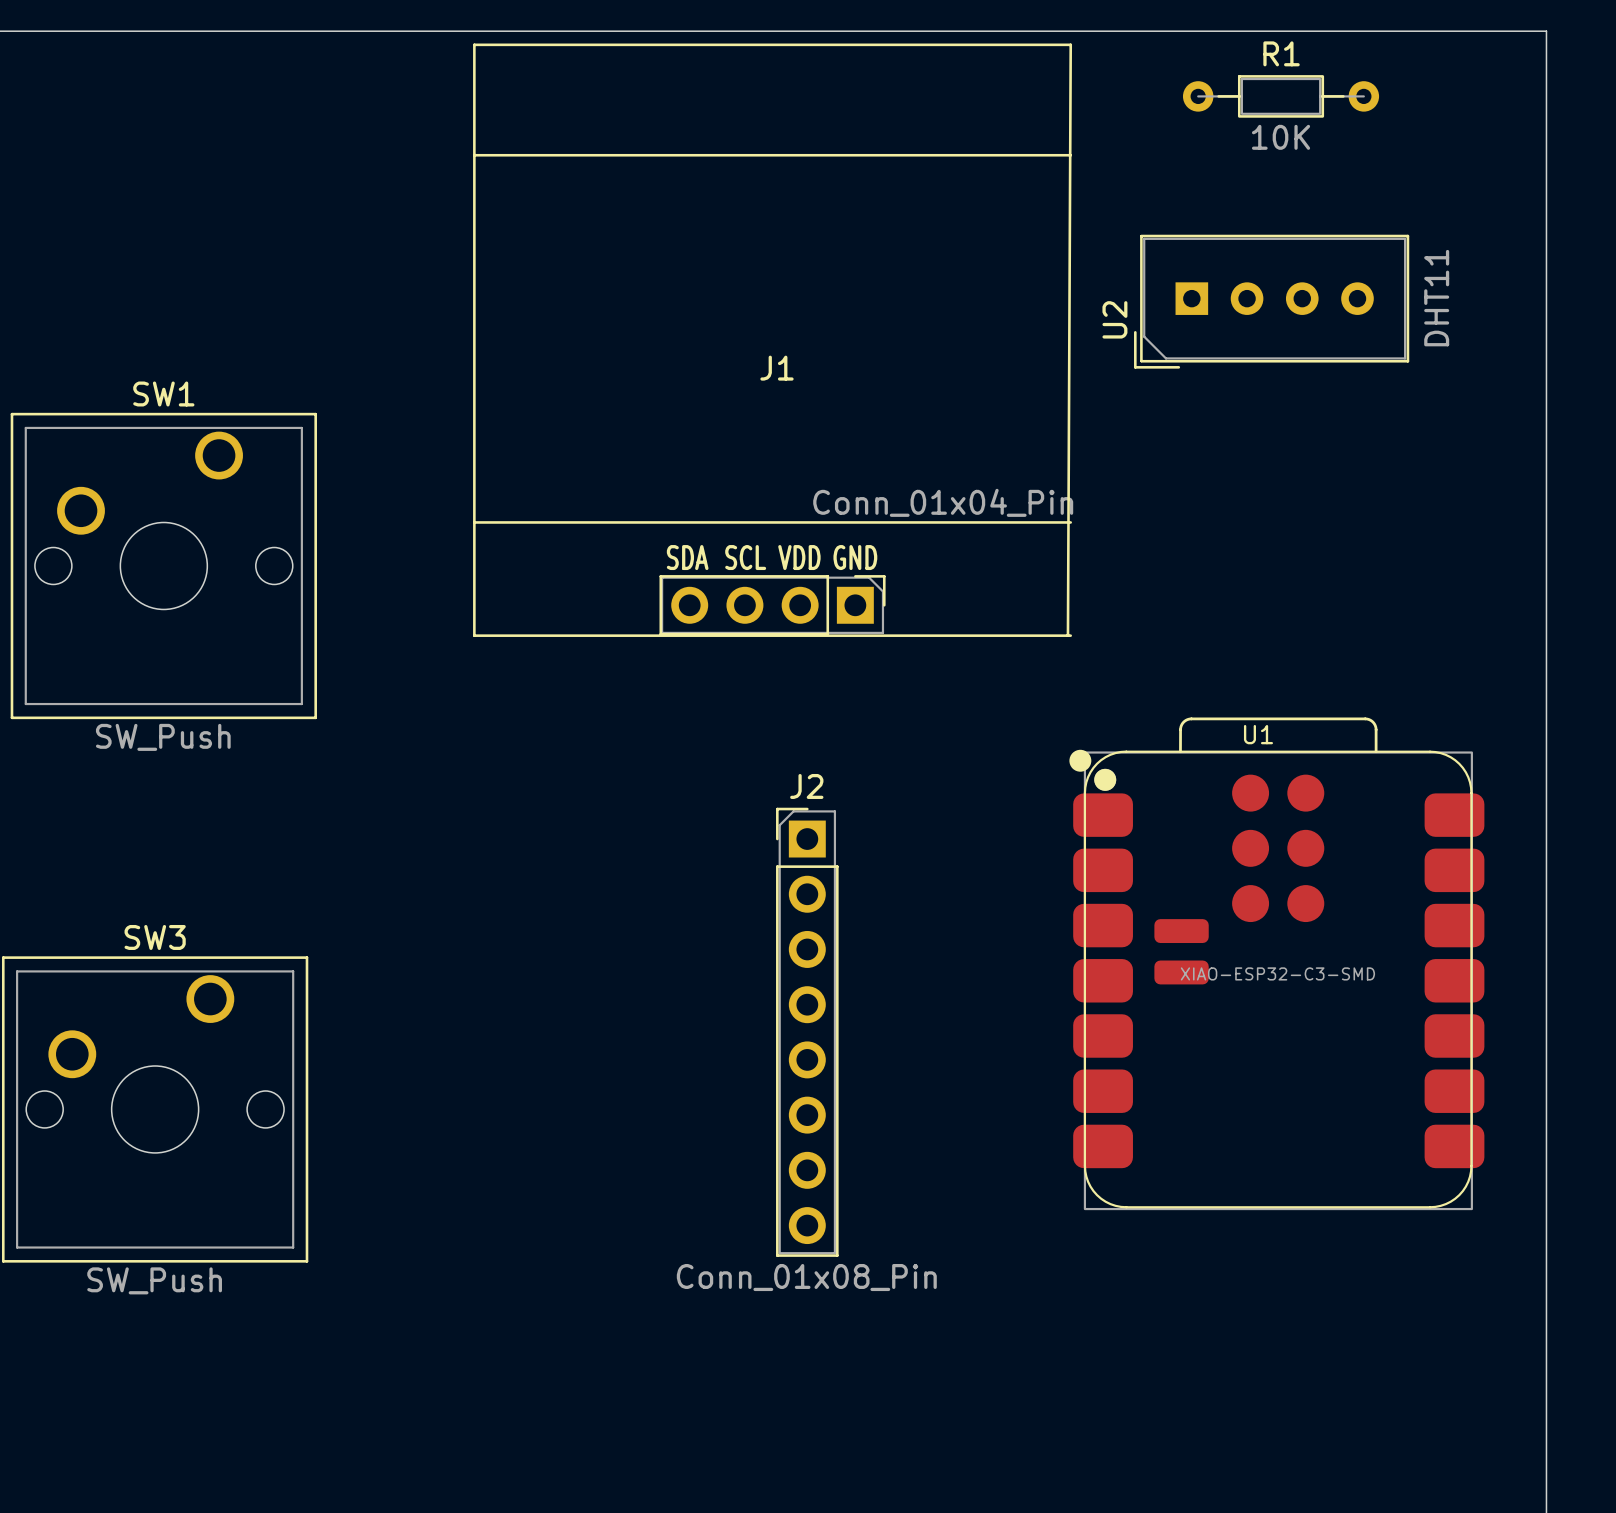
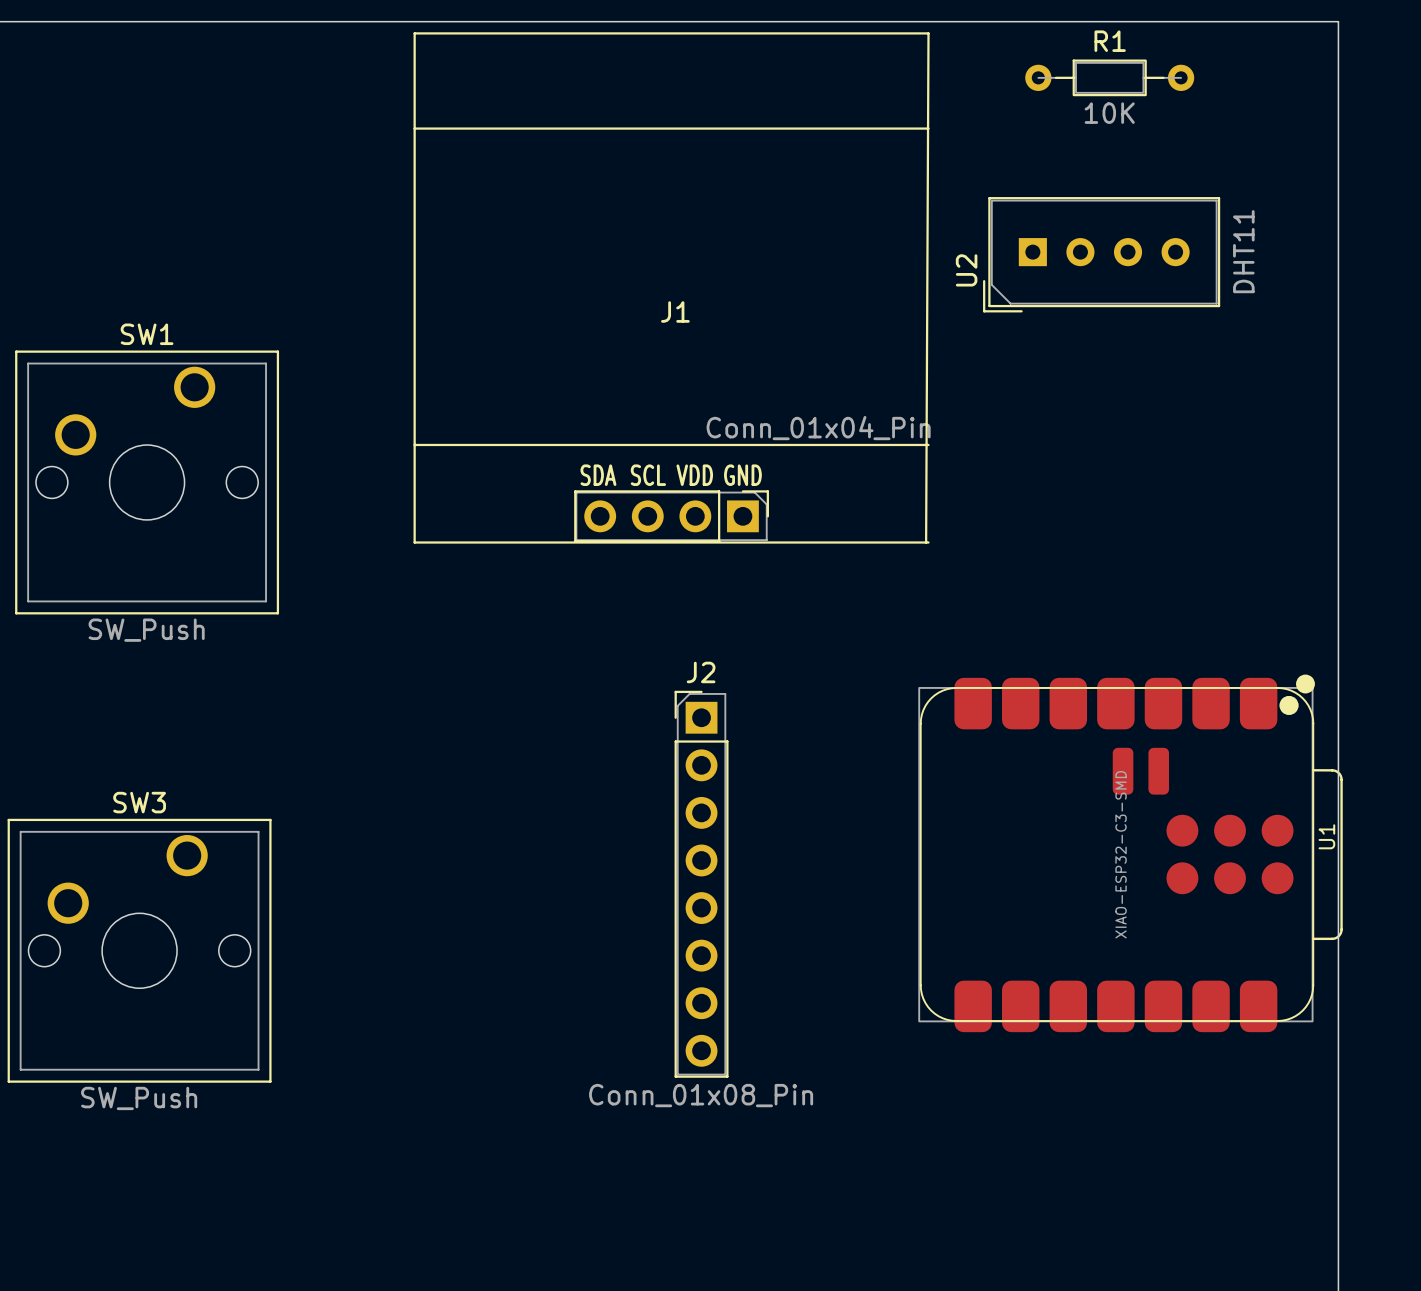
U1 rotation: 0° (1276, 963) -> 90° clockwise (1130, 853)

